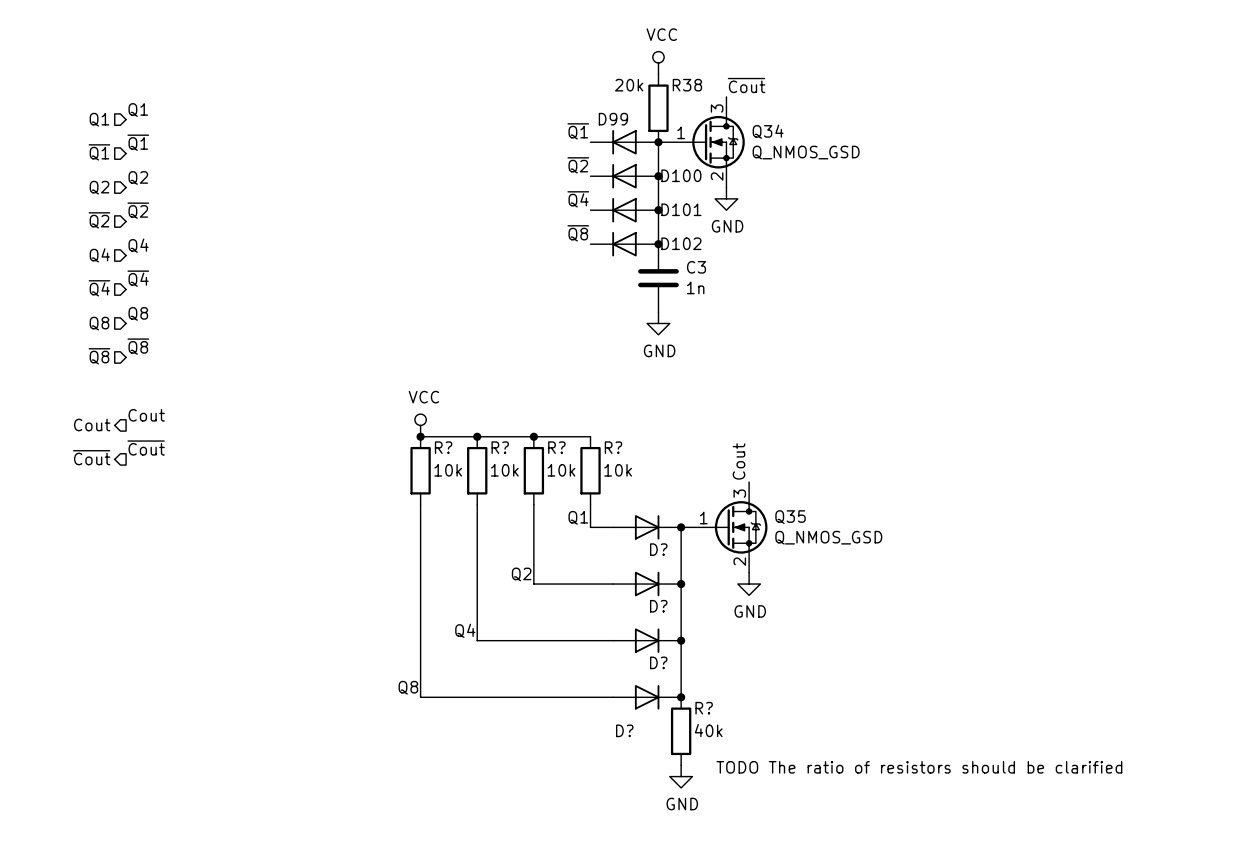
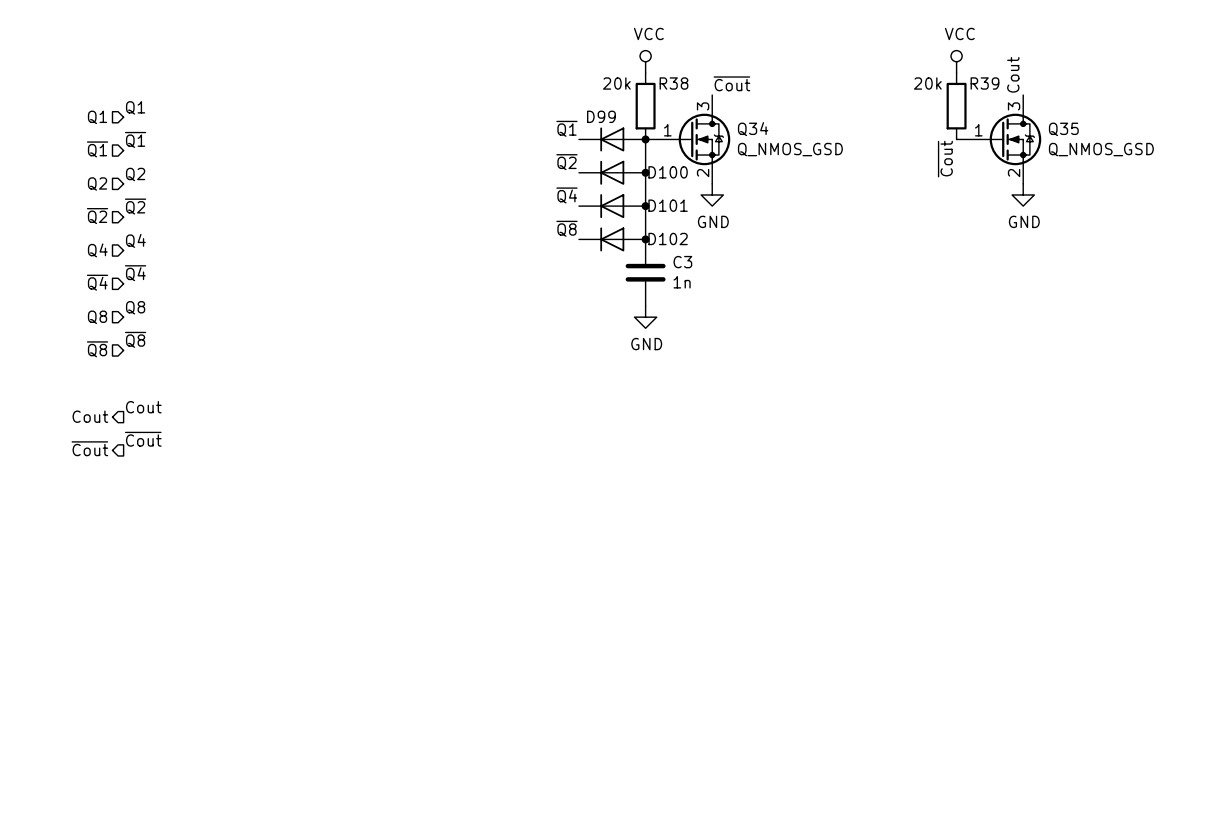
power symbol: none -> VCC (956, 61)
label: none -> Cout (1013, 74)
R39: none -> 20k (956, 106)
label: none -> ~{Cout} (945, 159)
power symbol: none -> GND (1023, 194)
power symbol: VCC (420, 425) -> none
wire: (420, 436) (590, 436) -> none
junction: (420, 436) -> none
junction: (477, 436) -> none
junction: (533, 436) -> none
label: Cout (738, 461) -> none
R?: 10k (420, 470) -> none
R?: 10k (477, 470) -> none
R?: 10k (533, 470) -> none
R?: 10k (590, 470) -> none
wire: (420, 504) (420, 697) (613, 697) -> none
wire: (477, 504) (477, 640) (613, 640) -> none
wire: (533, 504) (533, 584) (613, 584) -> none
wire: (590, 504) (590, 527) (613, 527) -> none
label: Q1 (578, 517) -> none
D?: (647, 527) -> none
wire: (681, 527) (681, 697) -> none
junction: (681, 527) -> none
Q35 position: (724, 527) -> (998, 139)
label: Q2 (521, 574) -> none
D?: (647, 584) -> none
junction: (681, 584) -> none
power symbol: GND (749, 584) -> none
label: Q4 (465, 630) -> none
D?: (647, 640) -> none
junction: (681, 640) -> none
label: Q8 (408, 687) -> none
D?: (647, 697) -> none
junction: (681, 697) -> none
R?: 40k (681, 731) -> none
text: TODO The ratio of resistors should be clarified (919, 767) -> none
power symbol: GND (681, 776) -> none

